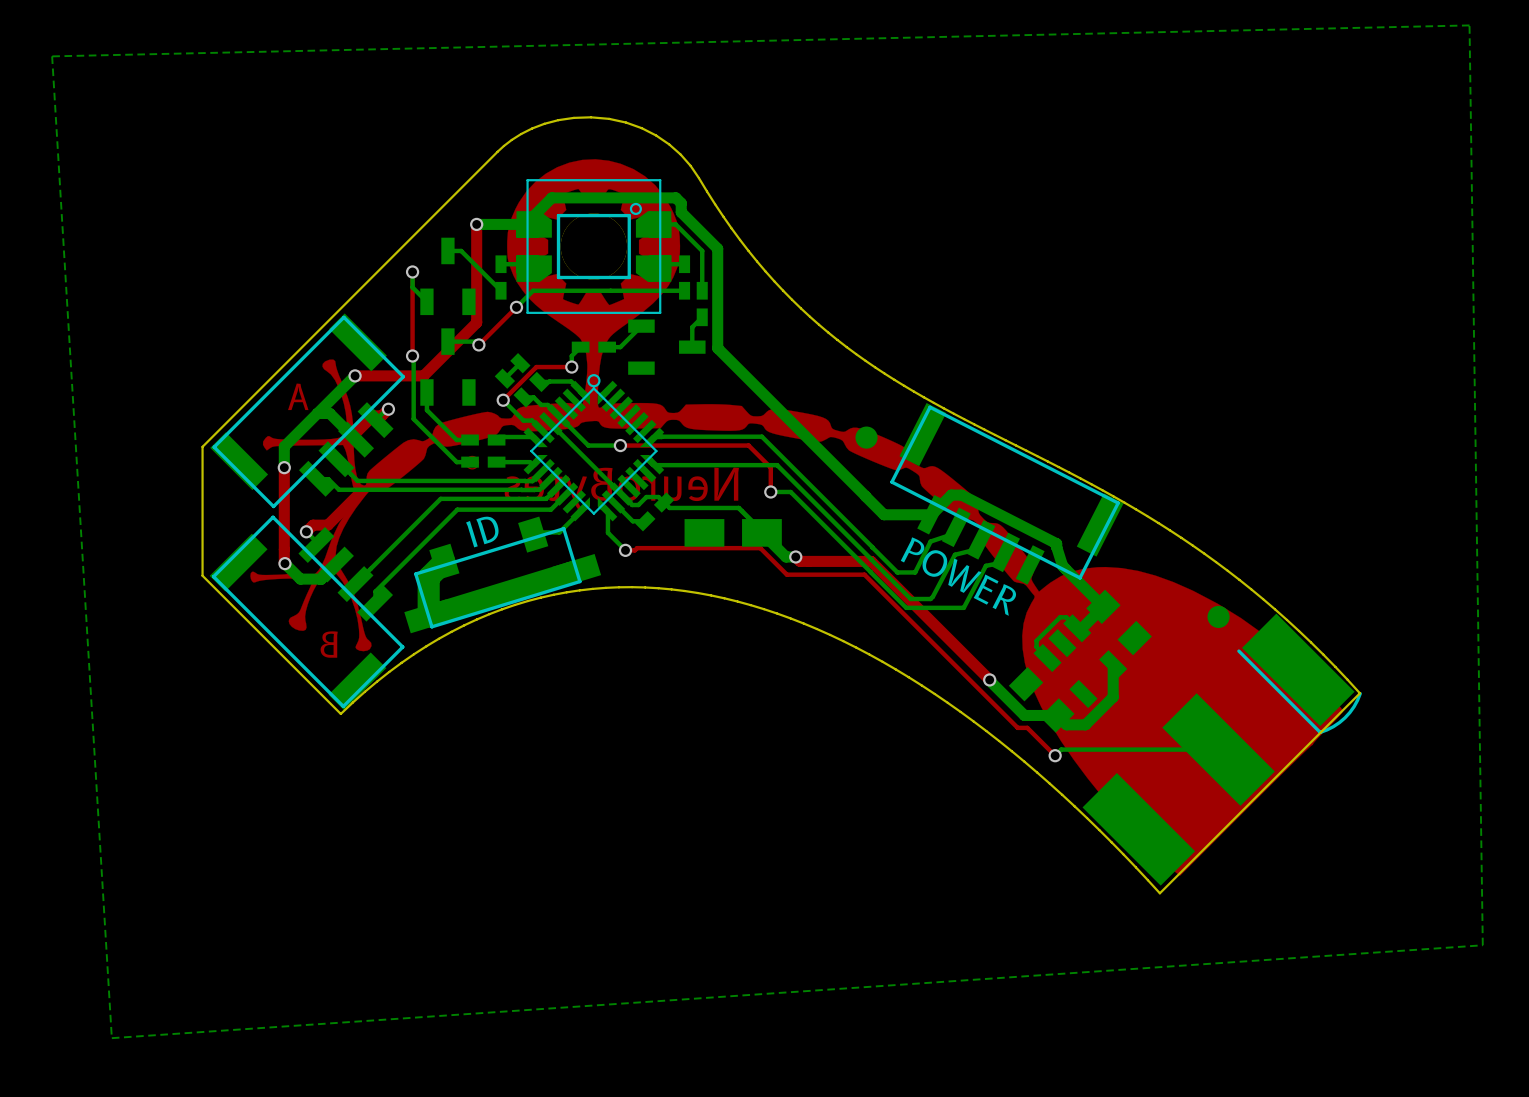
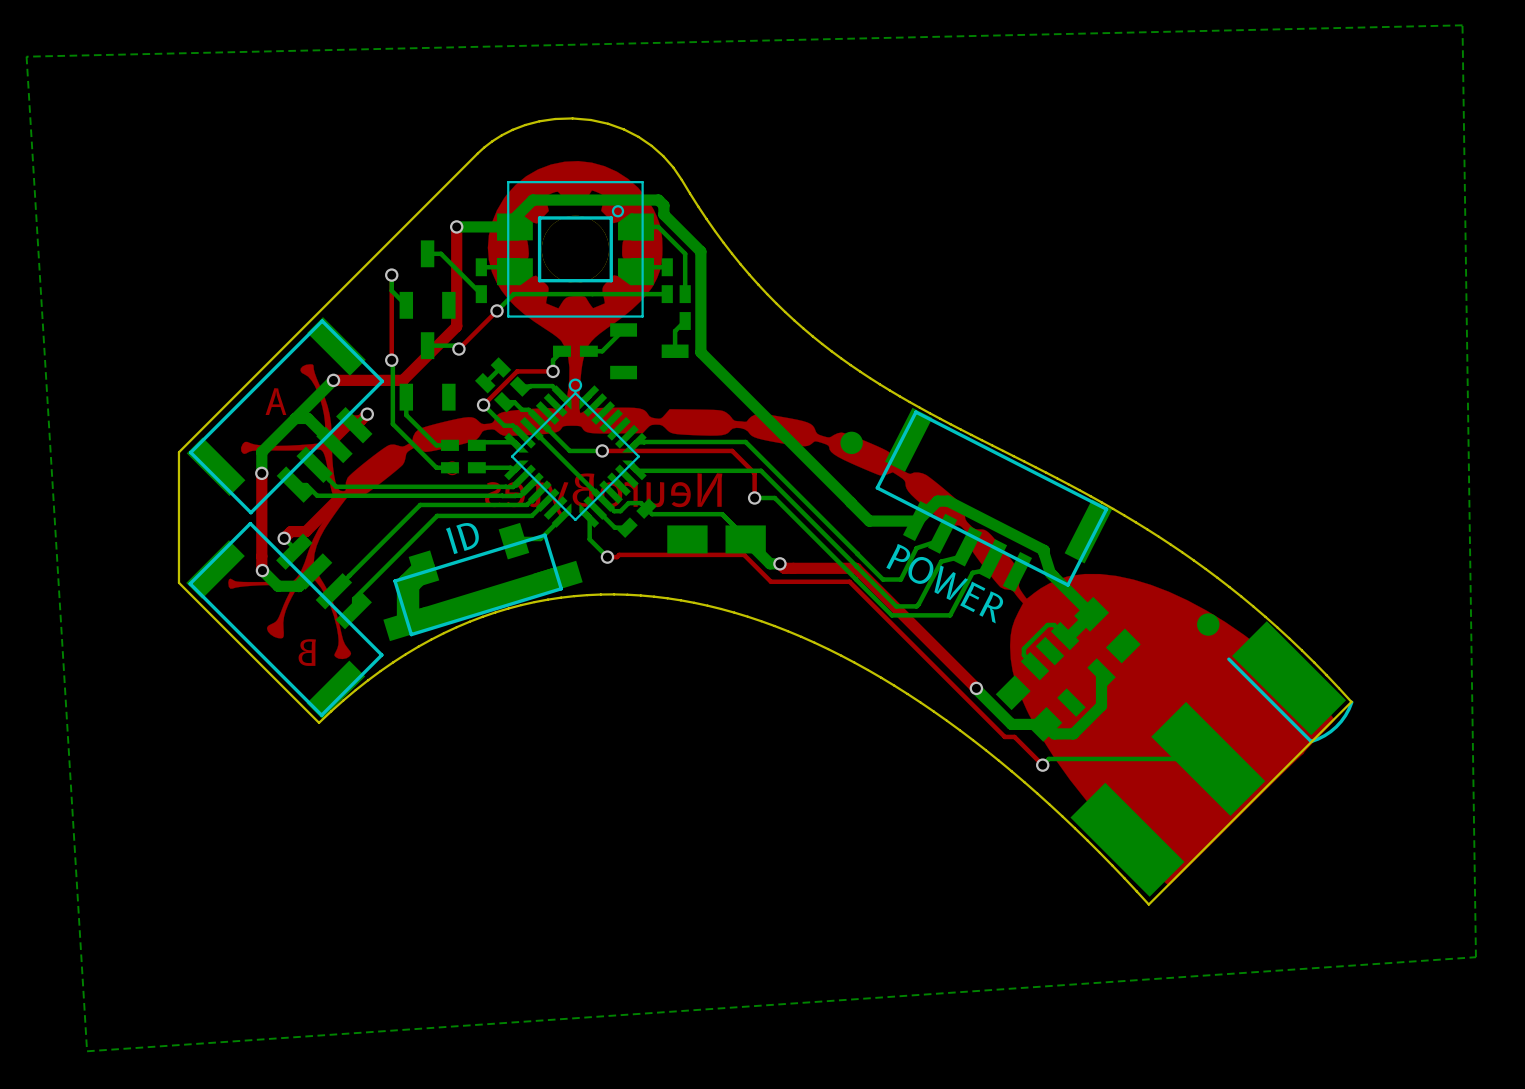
drawing shape: [250, 159, 1344, 876] -> [228, 161, 1335, 886]

